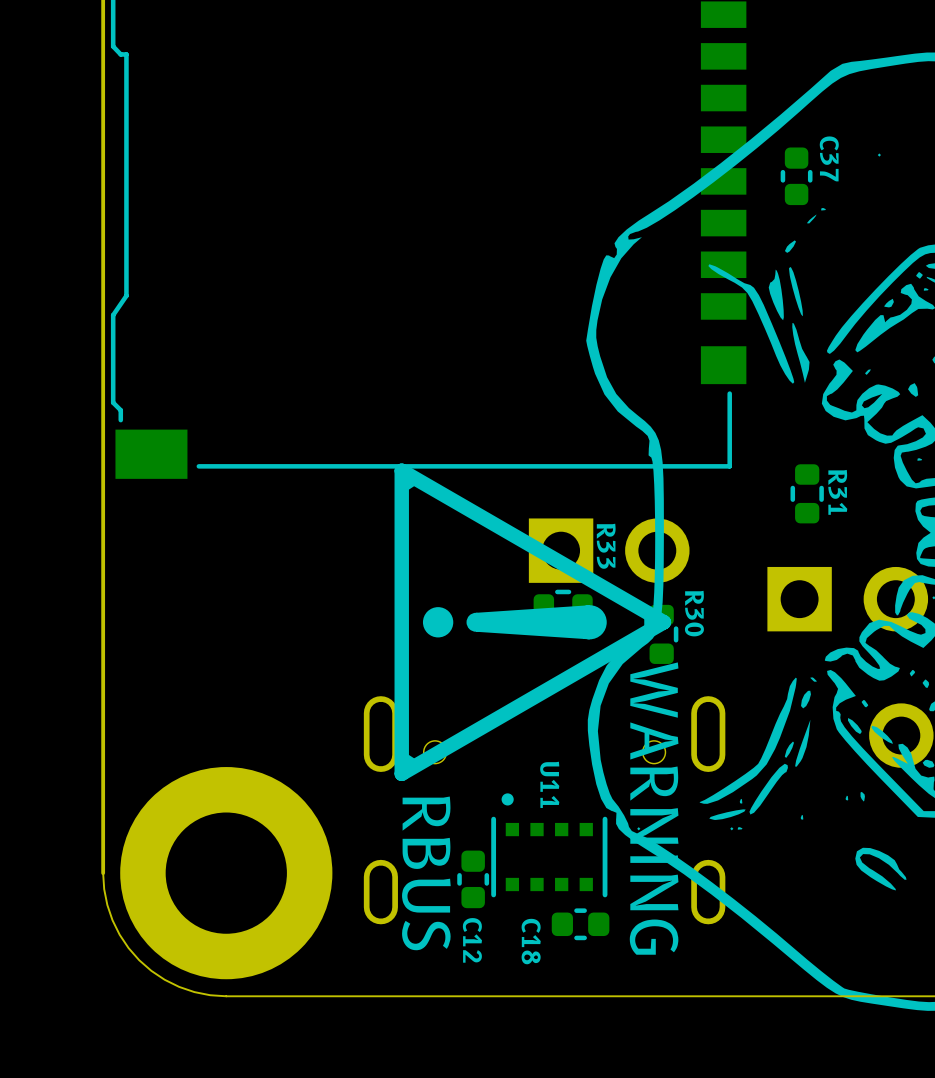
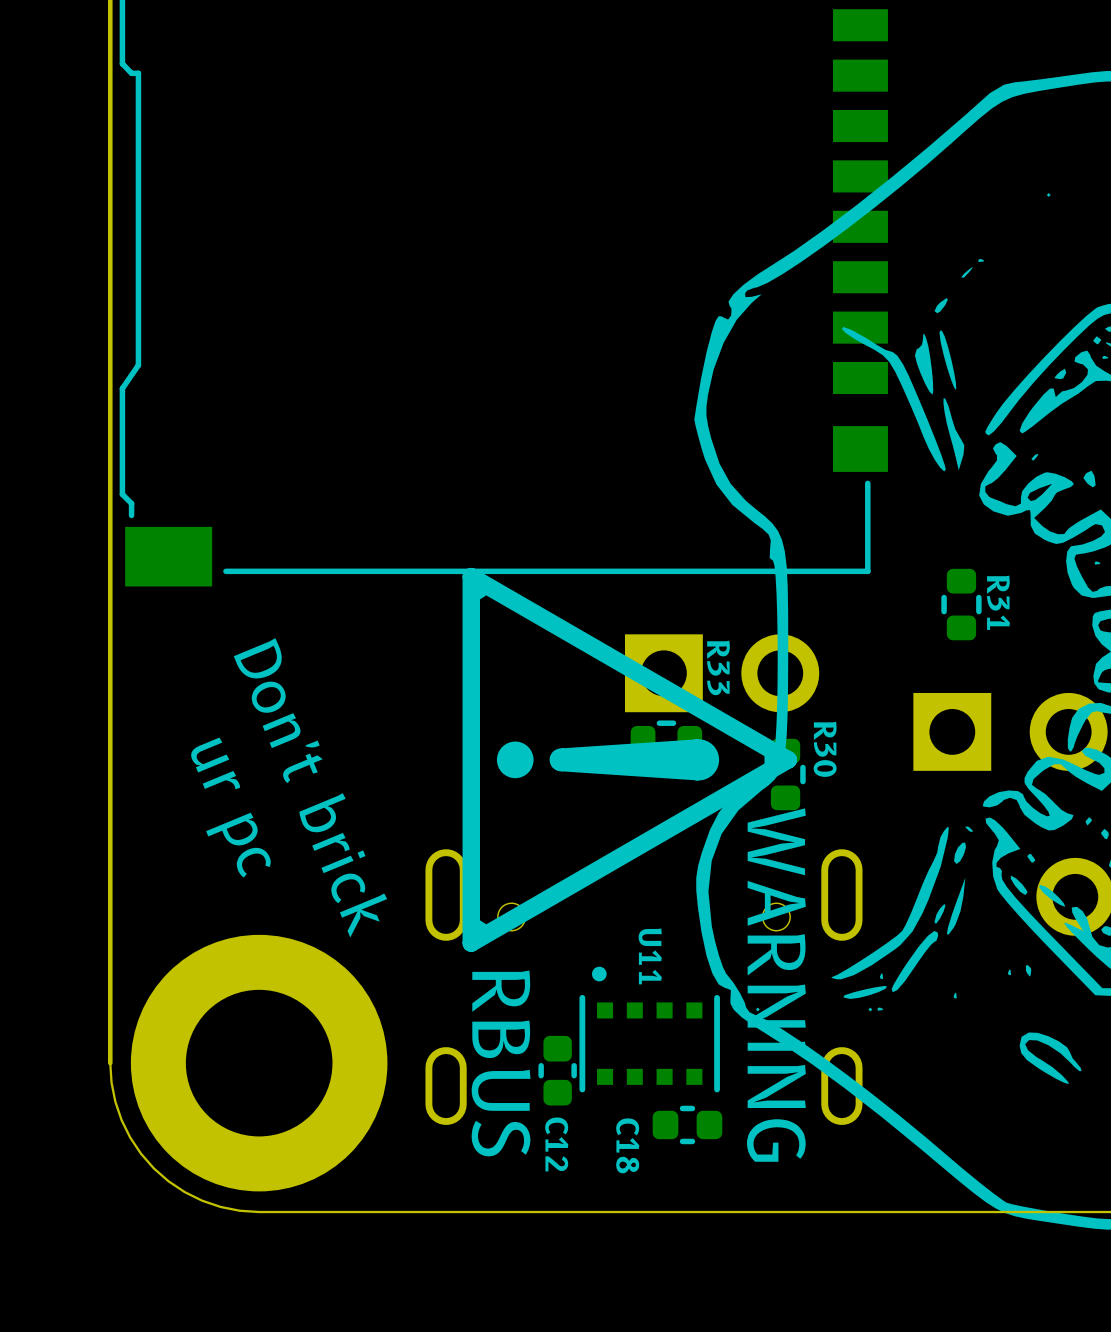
C37: (796, 176) -> none
part text: none -> Don't brick (310, 787)
part text: none -> ur pc (230, 807)

